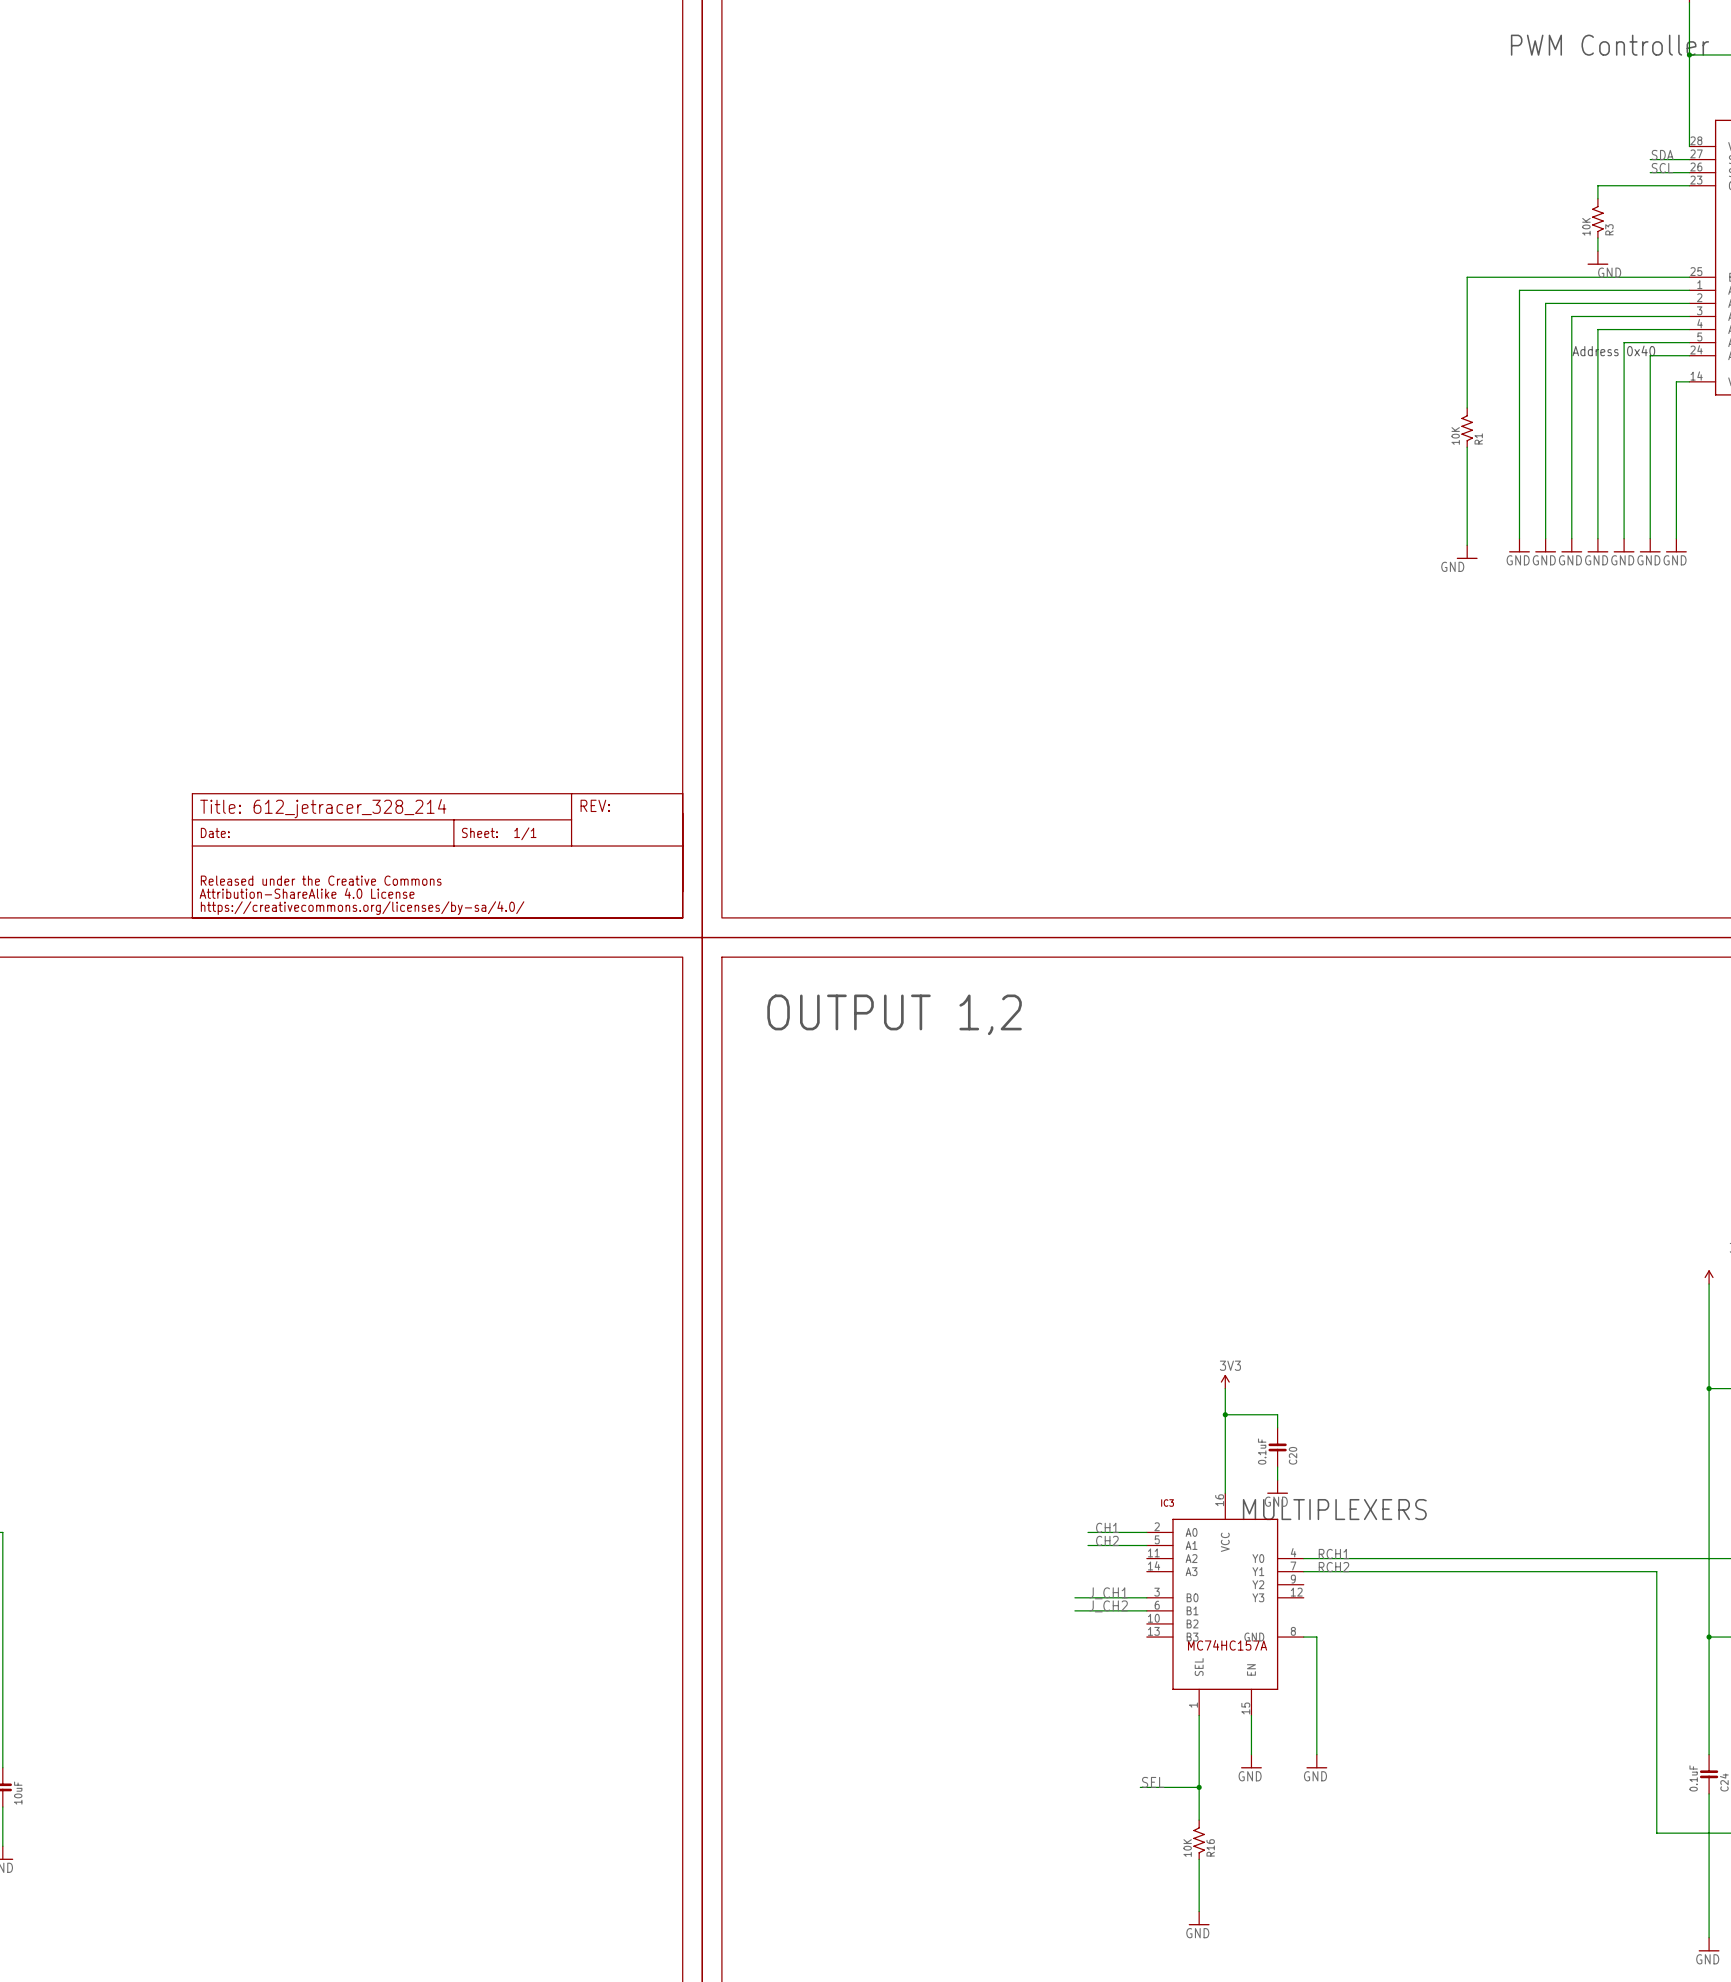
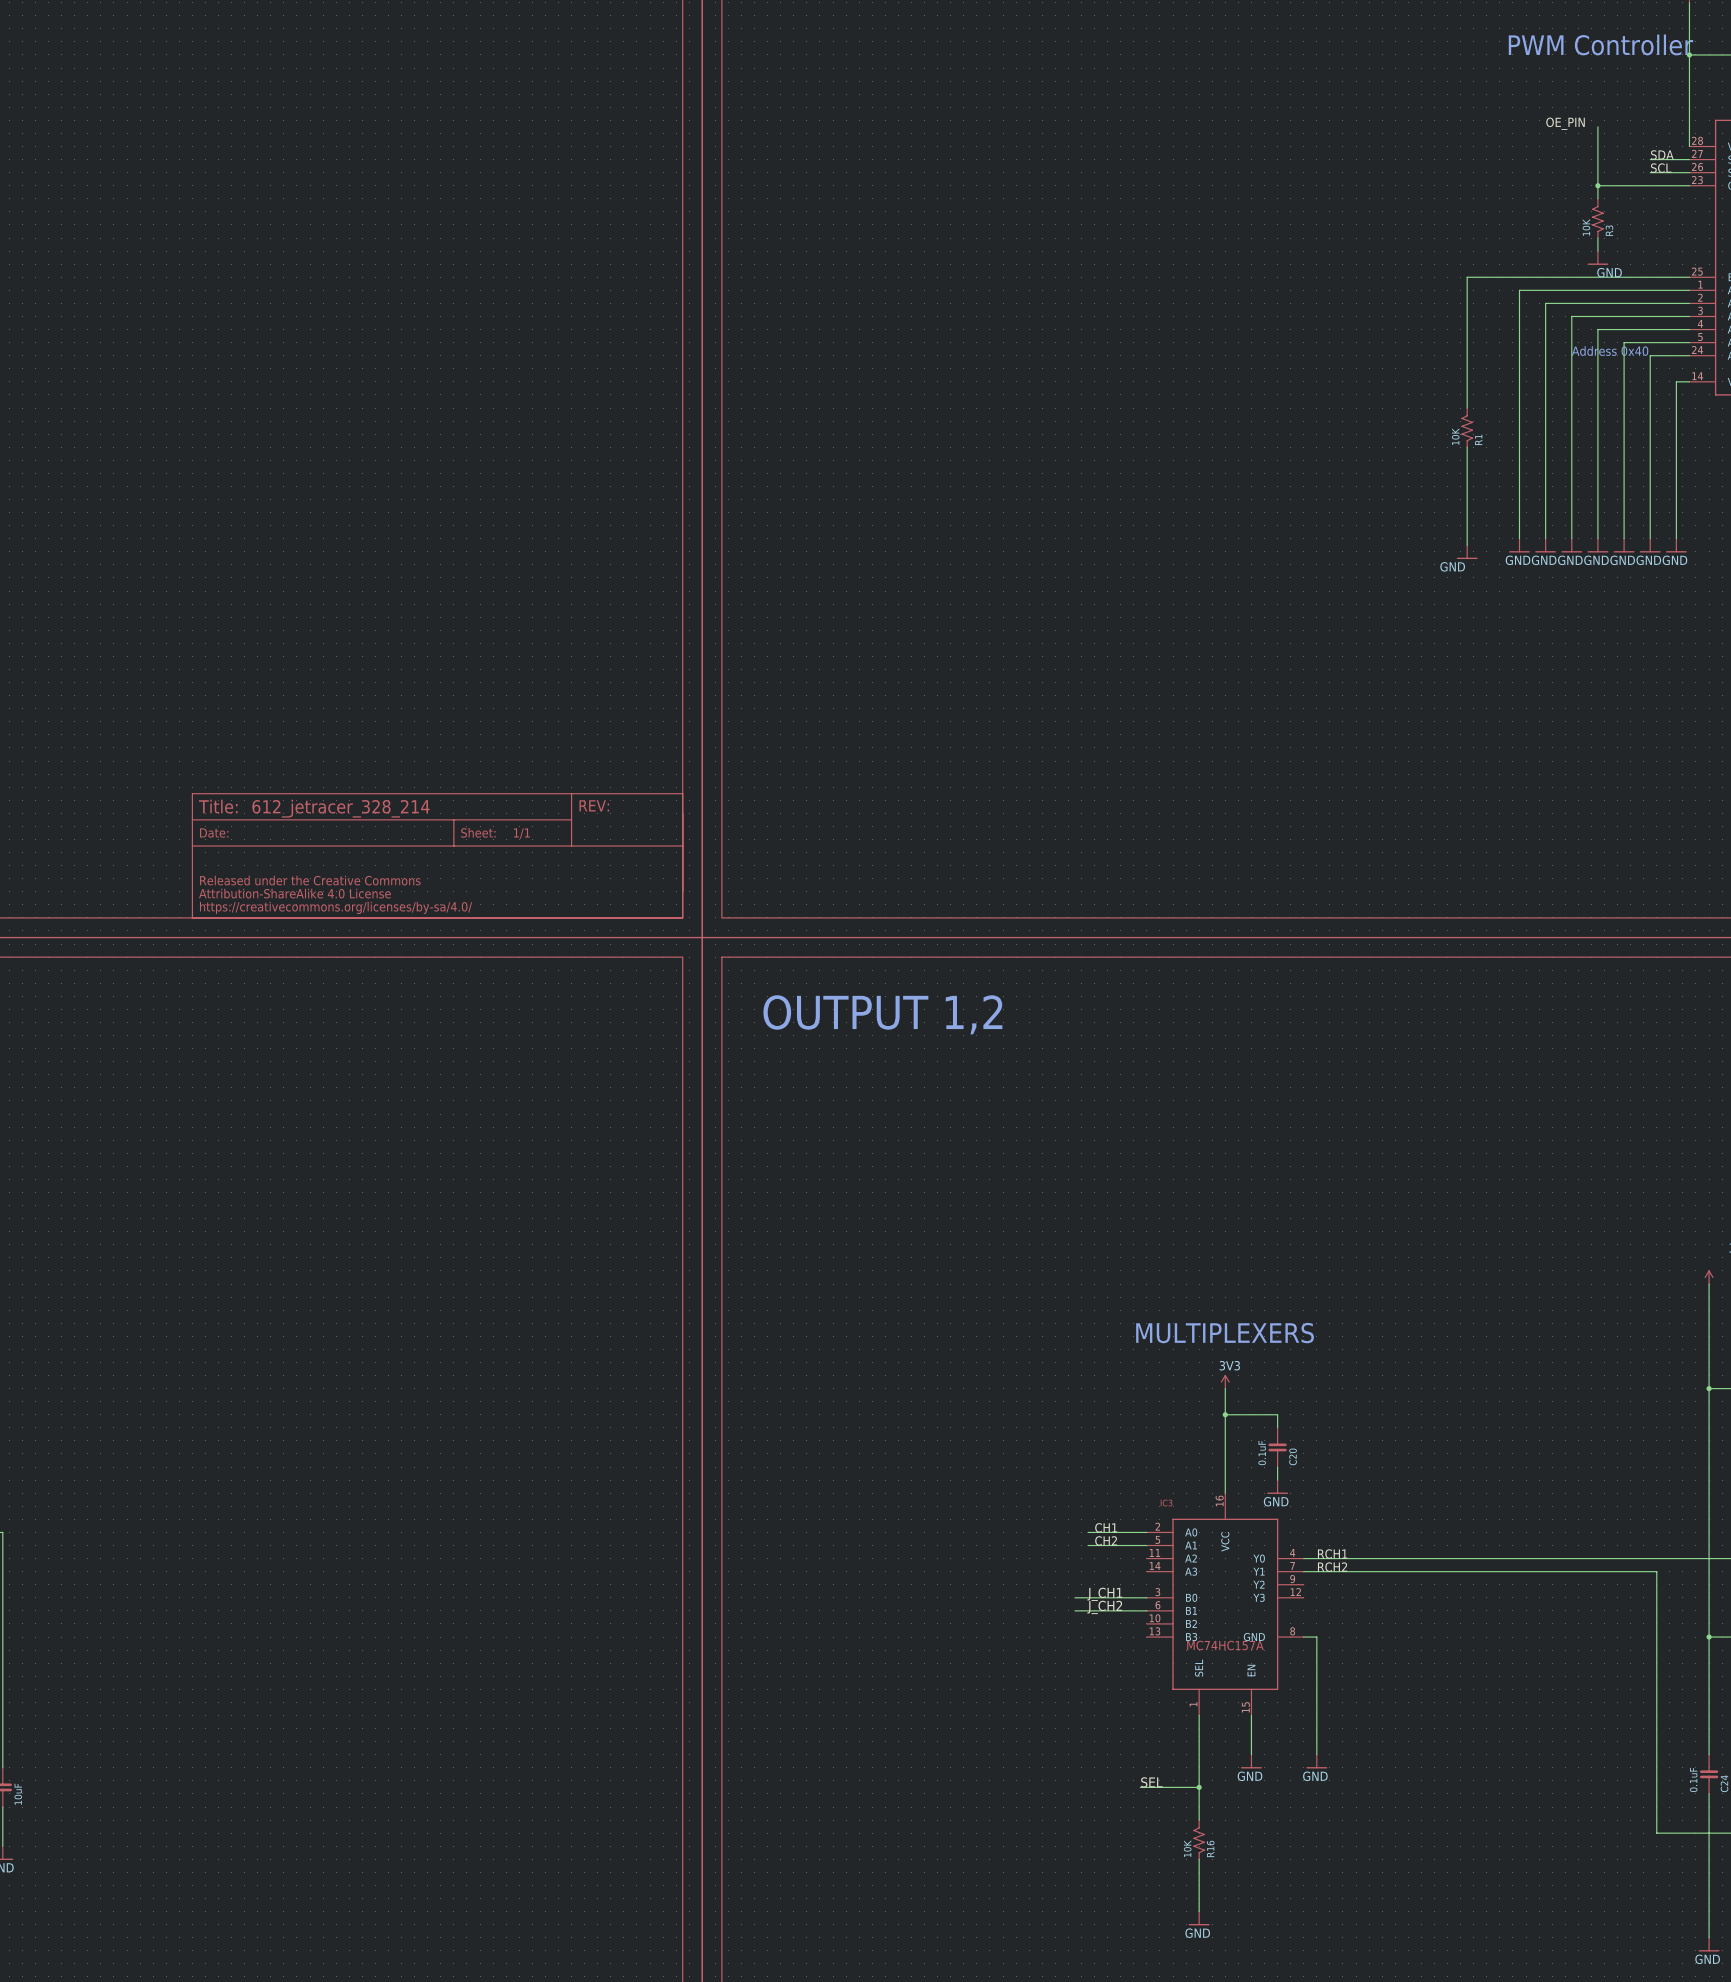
label: none -> OE_PIN (1565, 123)
wire: none -> (1597, 126) (1597, 185)
junction: none -> (1597, 185)
text: none -> MULTIPLEXERS (1225, 1333)
text: MULTIPLEXERS (1334, 1509) -> none

